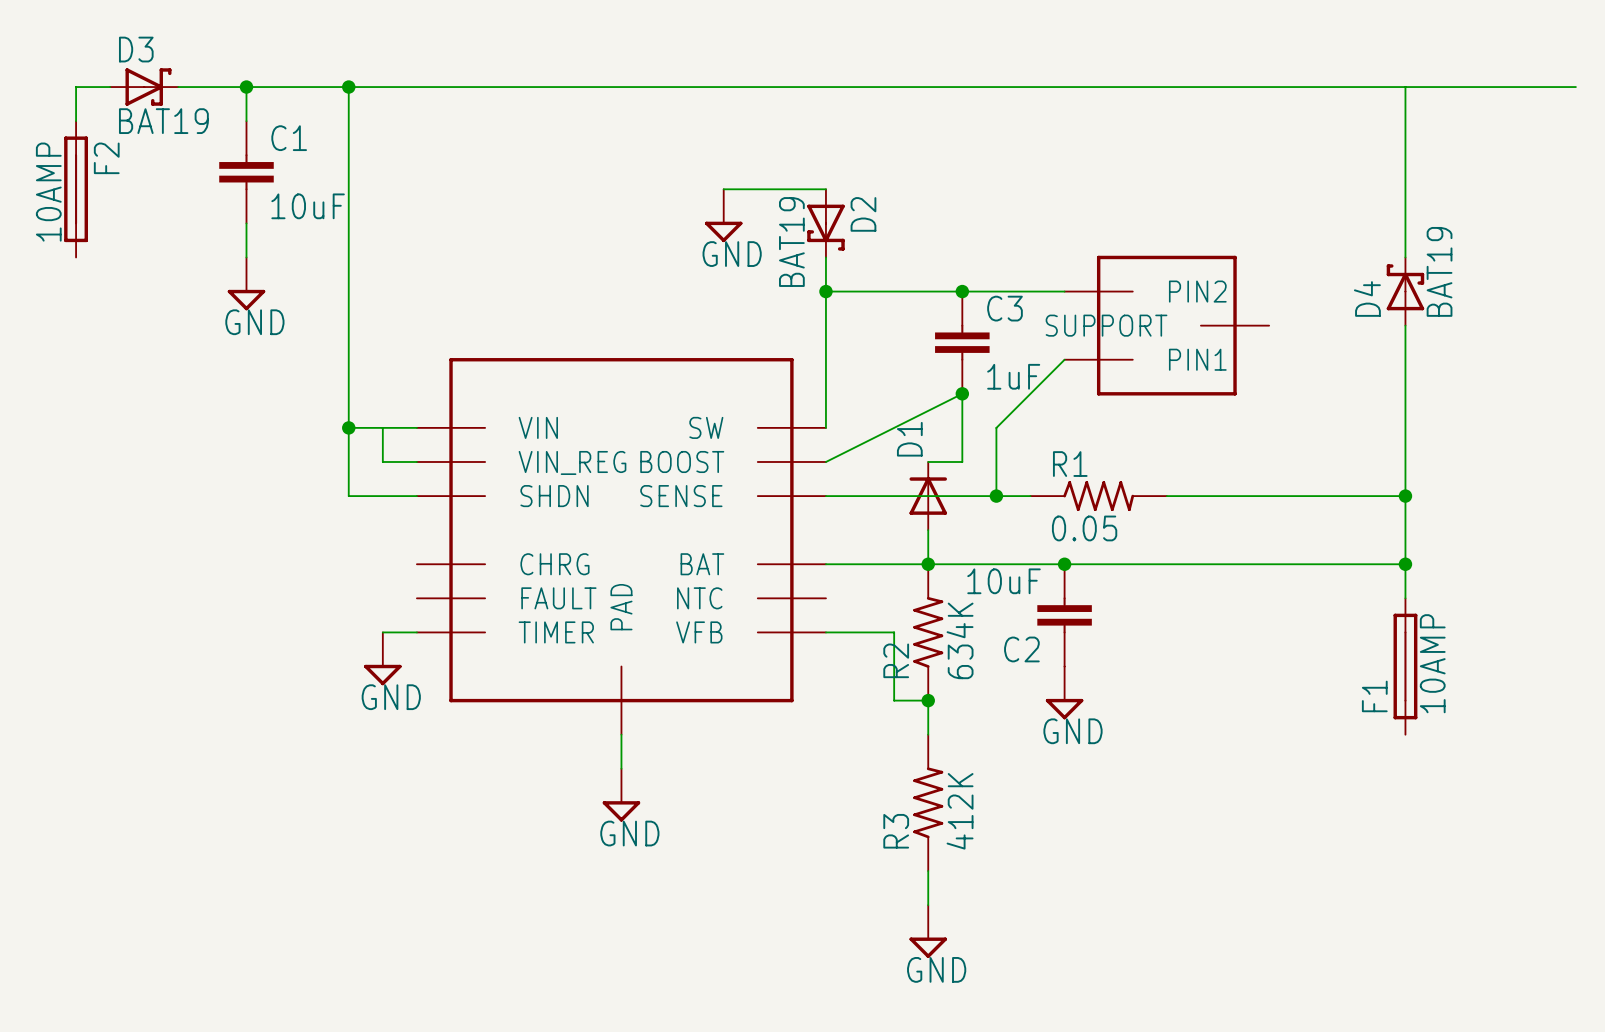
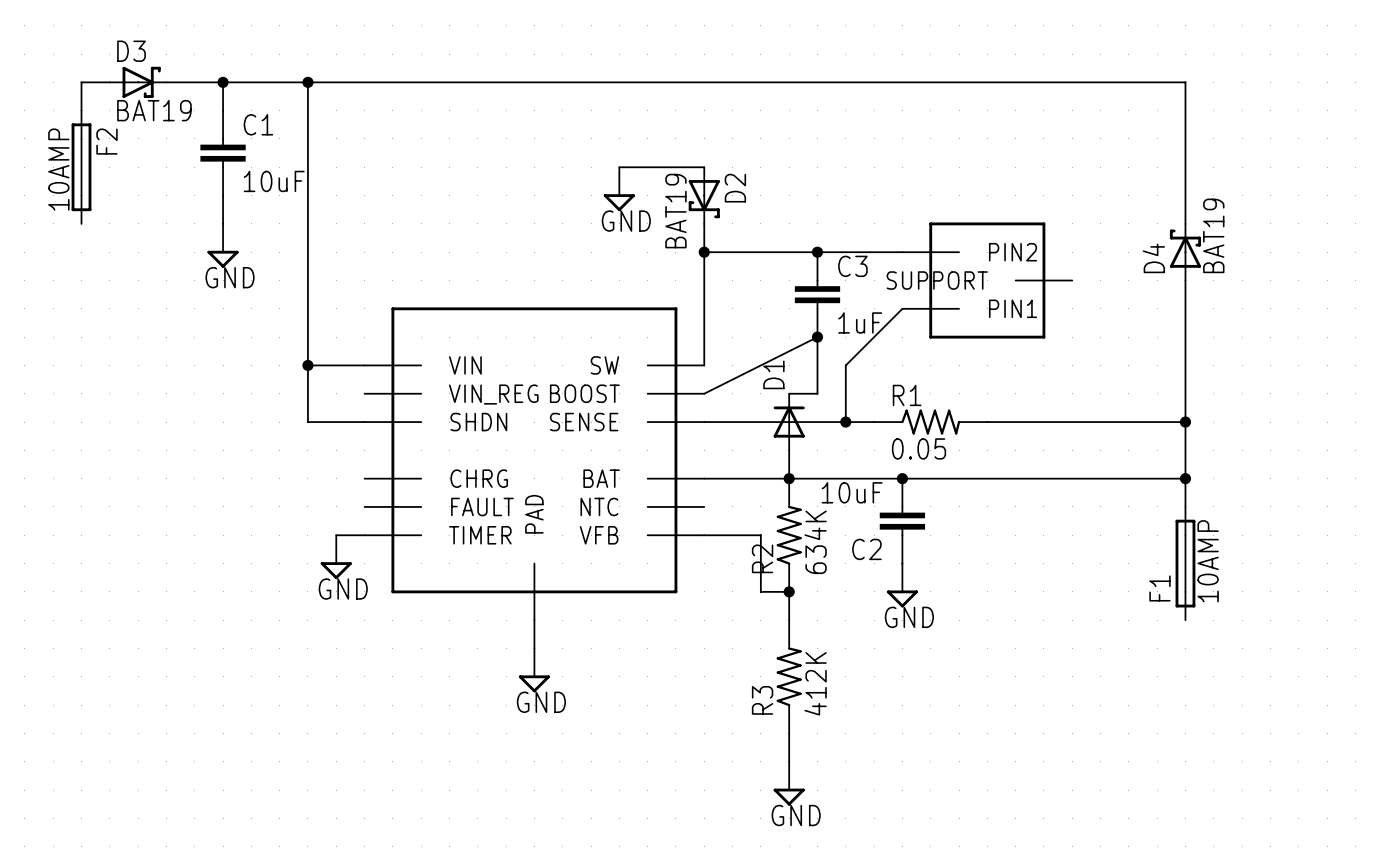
wire: (1405, 87) (1575, 87) -> none
wire: (382, 427) (382, 461) (416, 461) -> none

